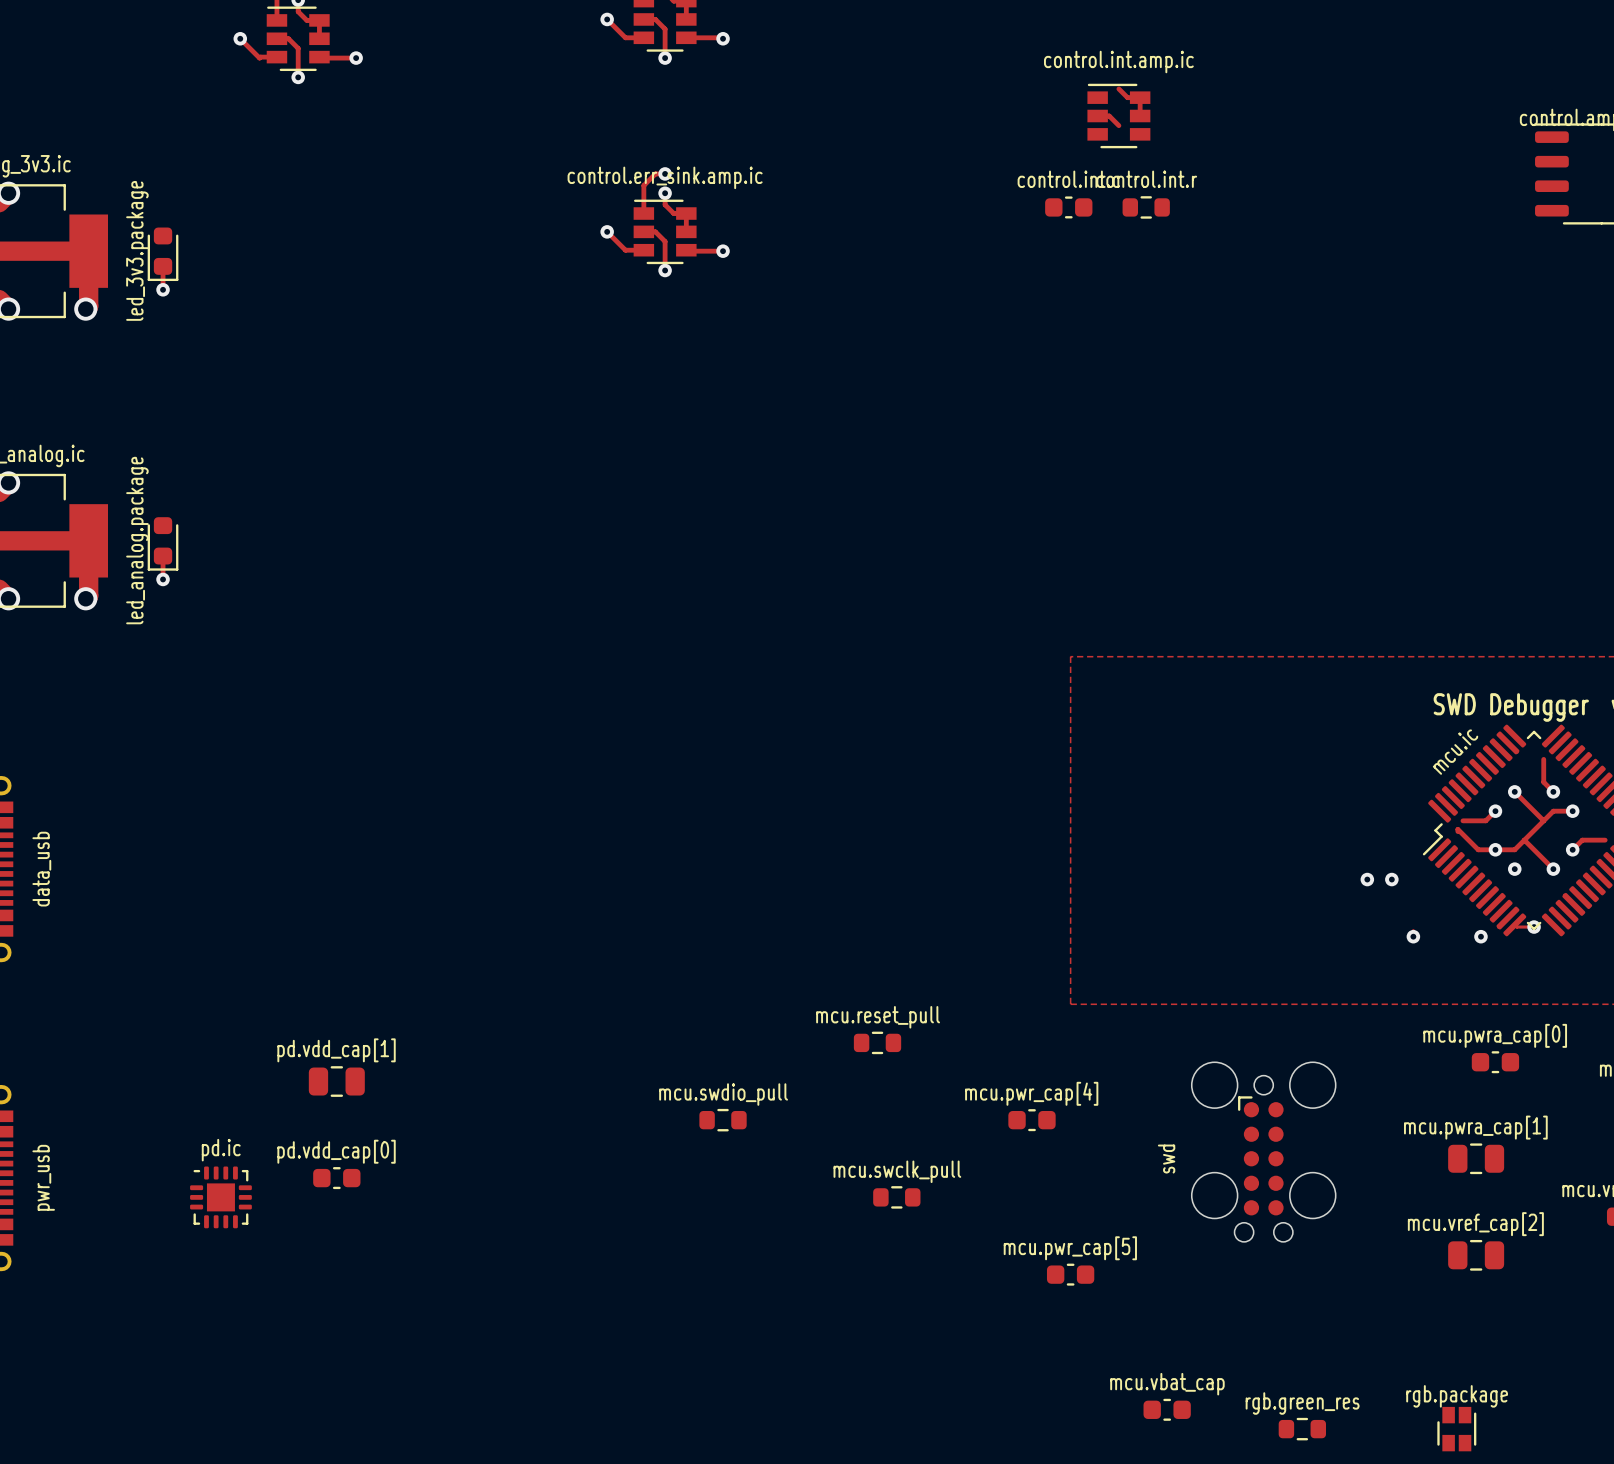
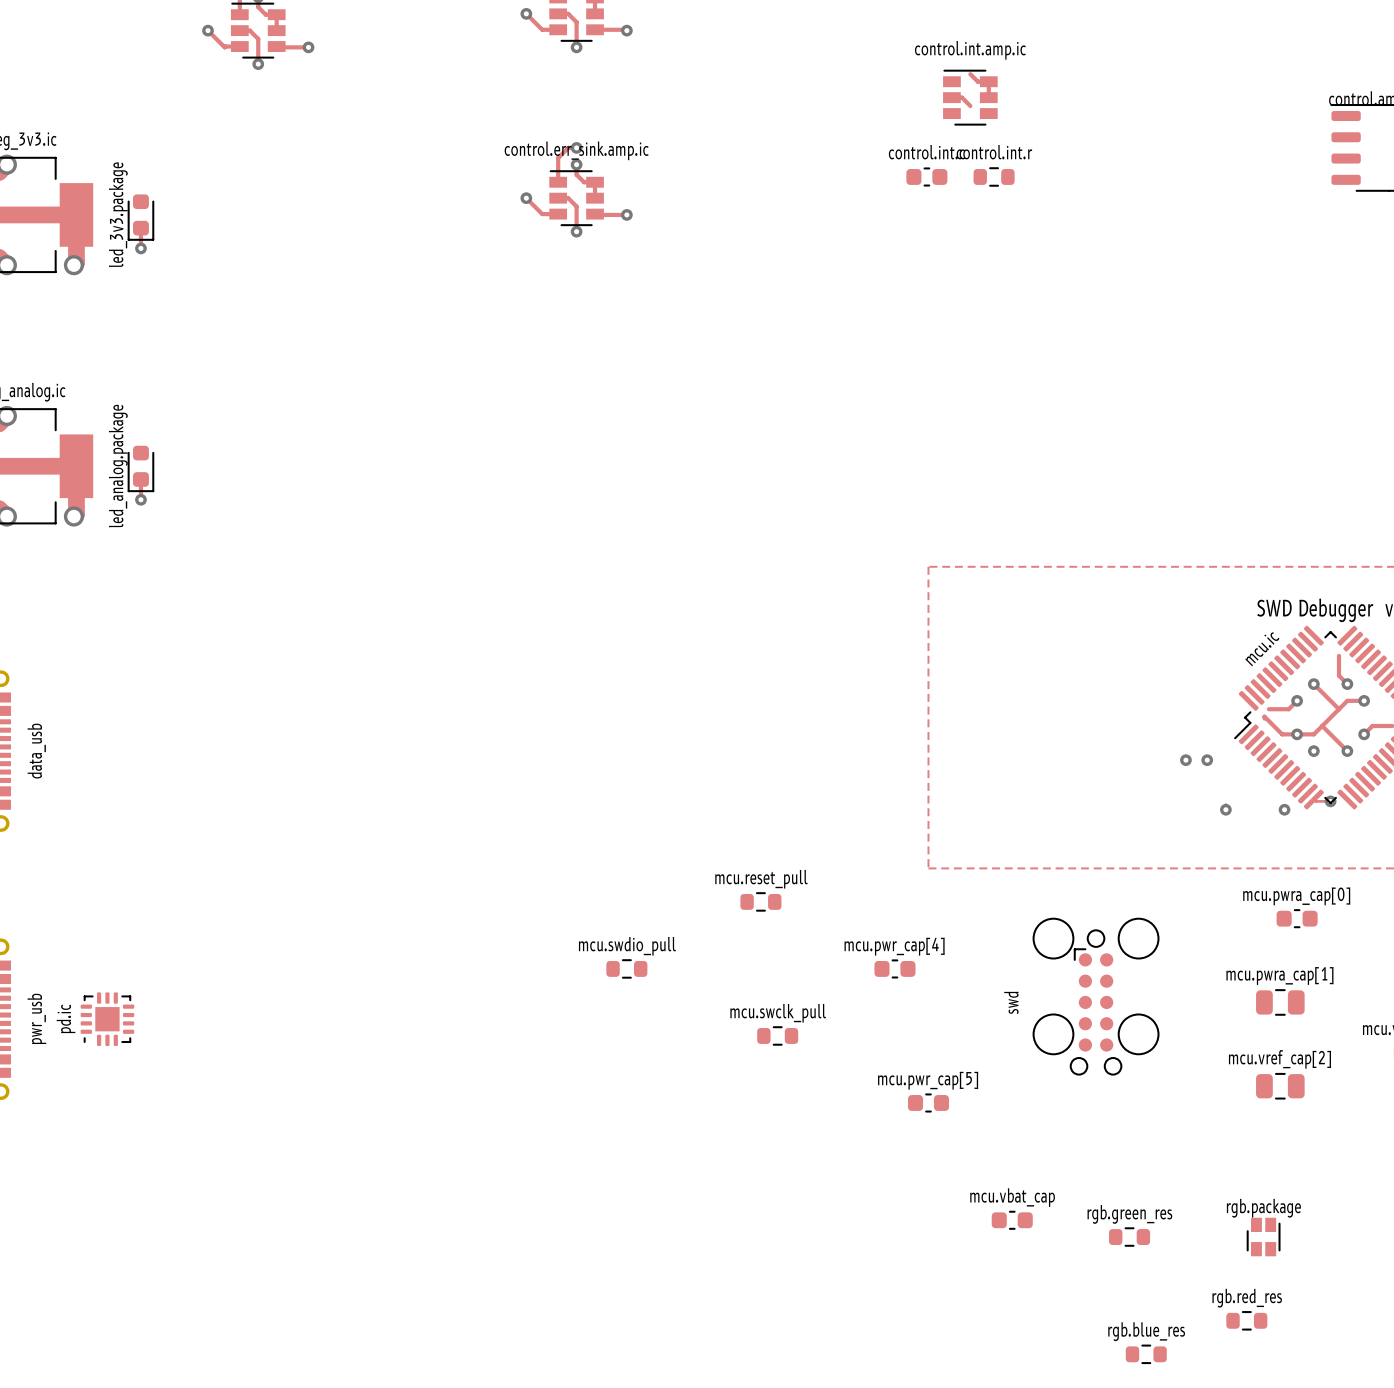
pd.vdd_cap[1]: (336, 1081) -> none
pd.vdd_cap[0]: (336, 1178) -> none
pd.ic rotation: 0° (220, 1197) -> 90° counterclockwise (107, 1019)
pd.ic position: (220, 1197) -> (107, 1019)

